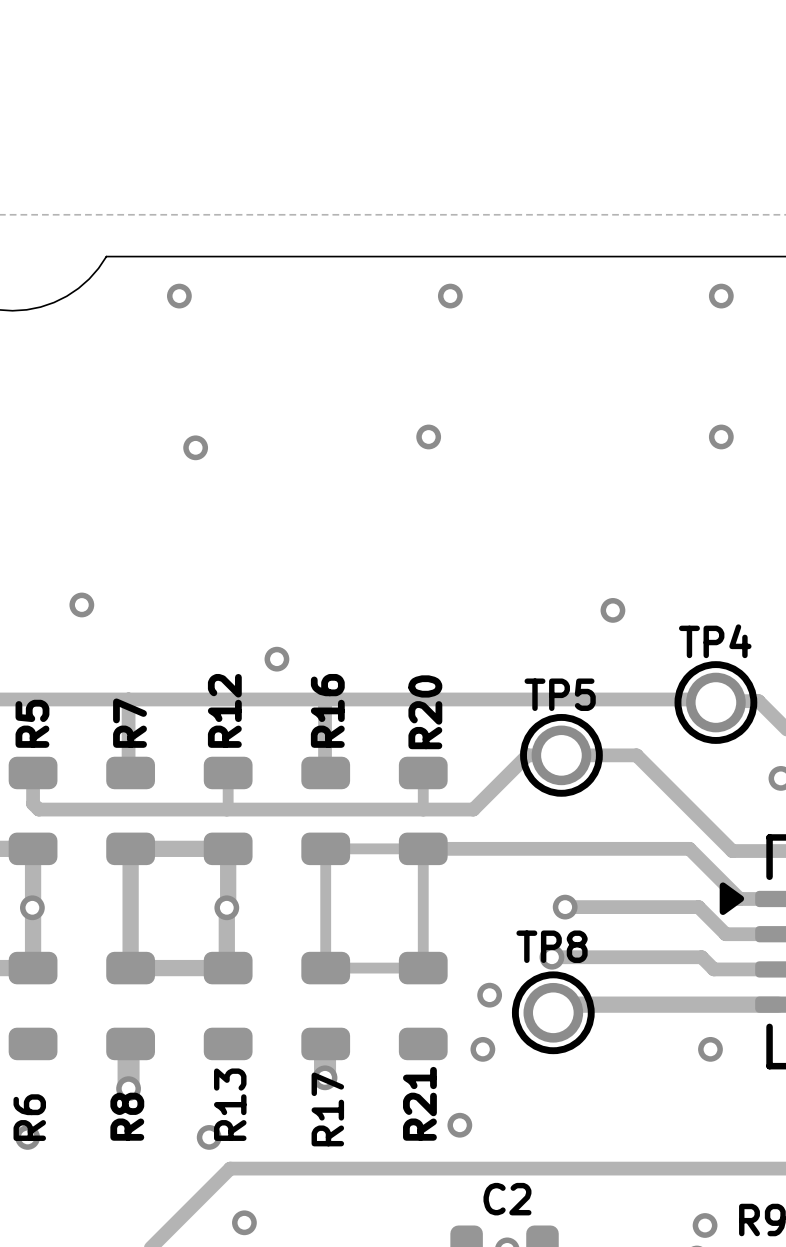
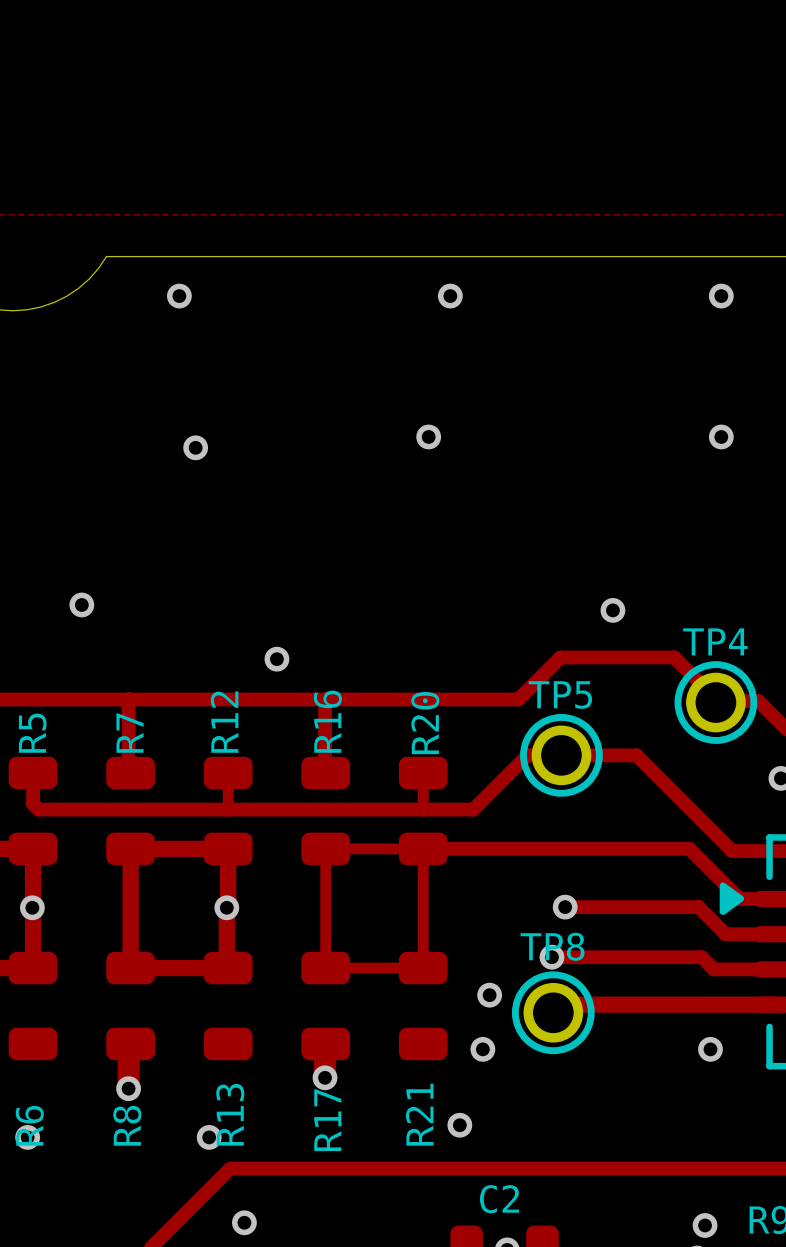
track: (518, 699) (716, 699) -> (518, 699) (560, 657) (674, 657) (716, 699)

